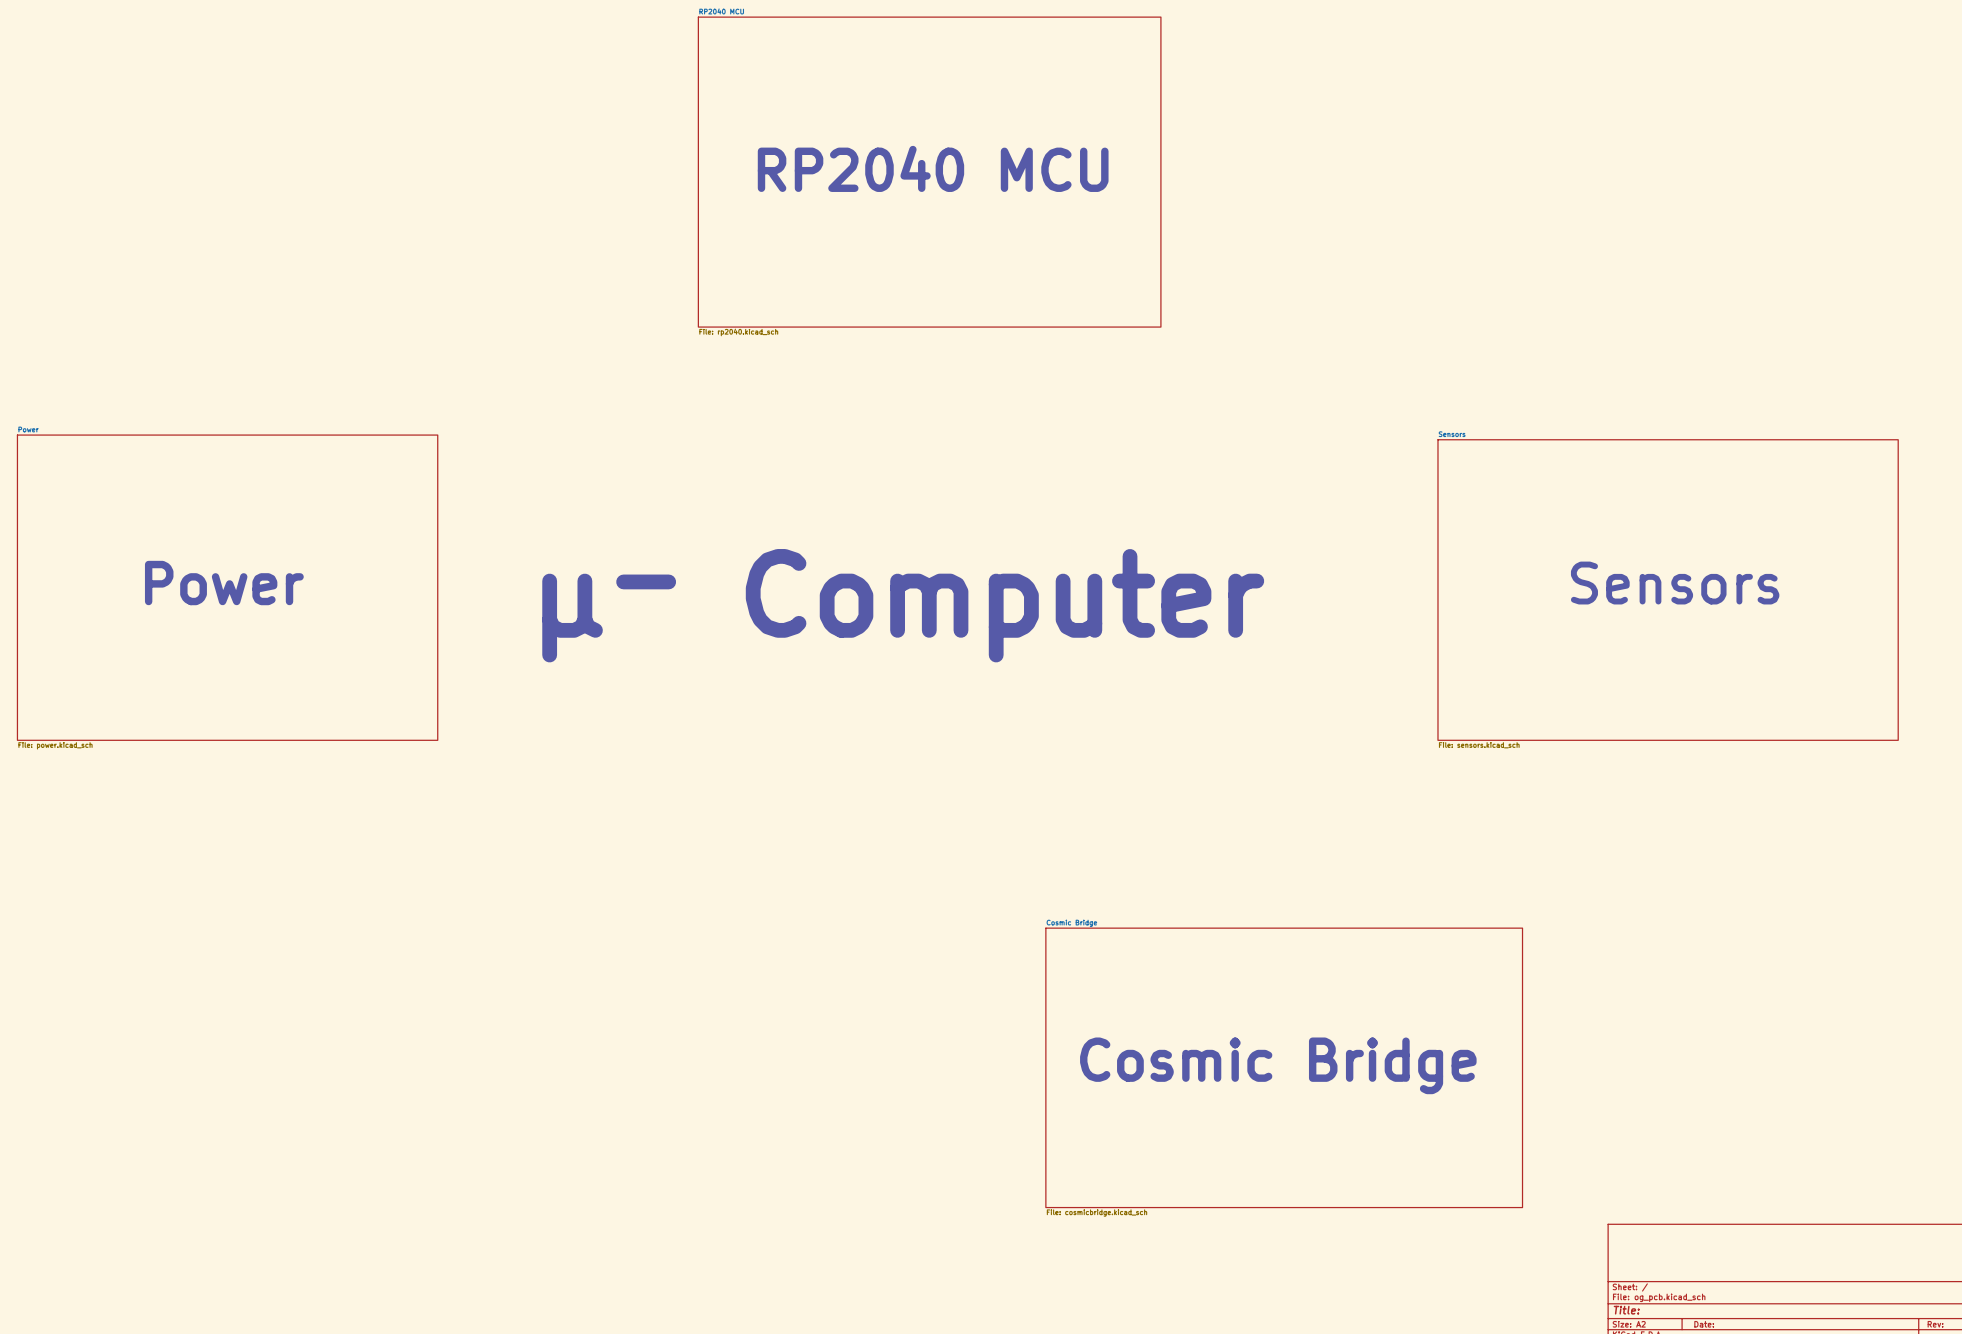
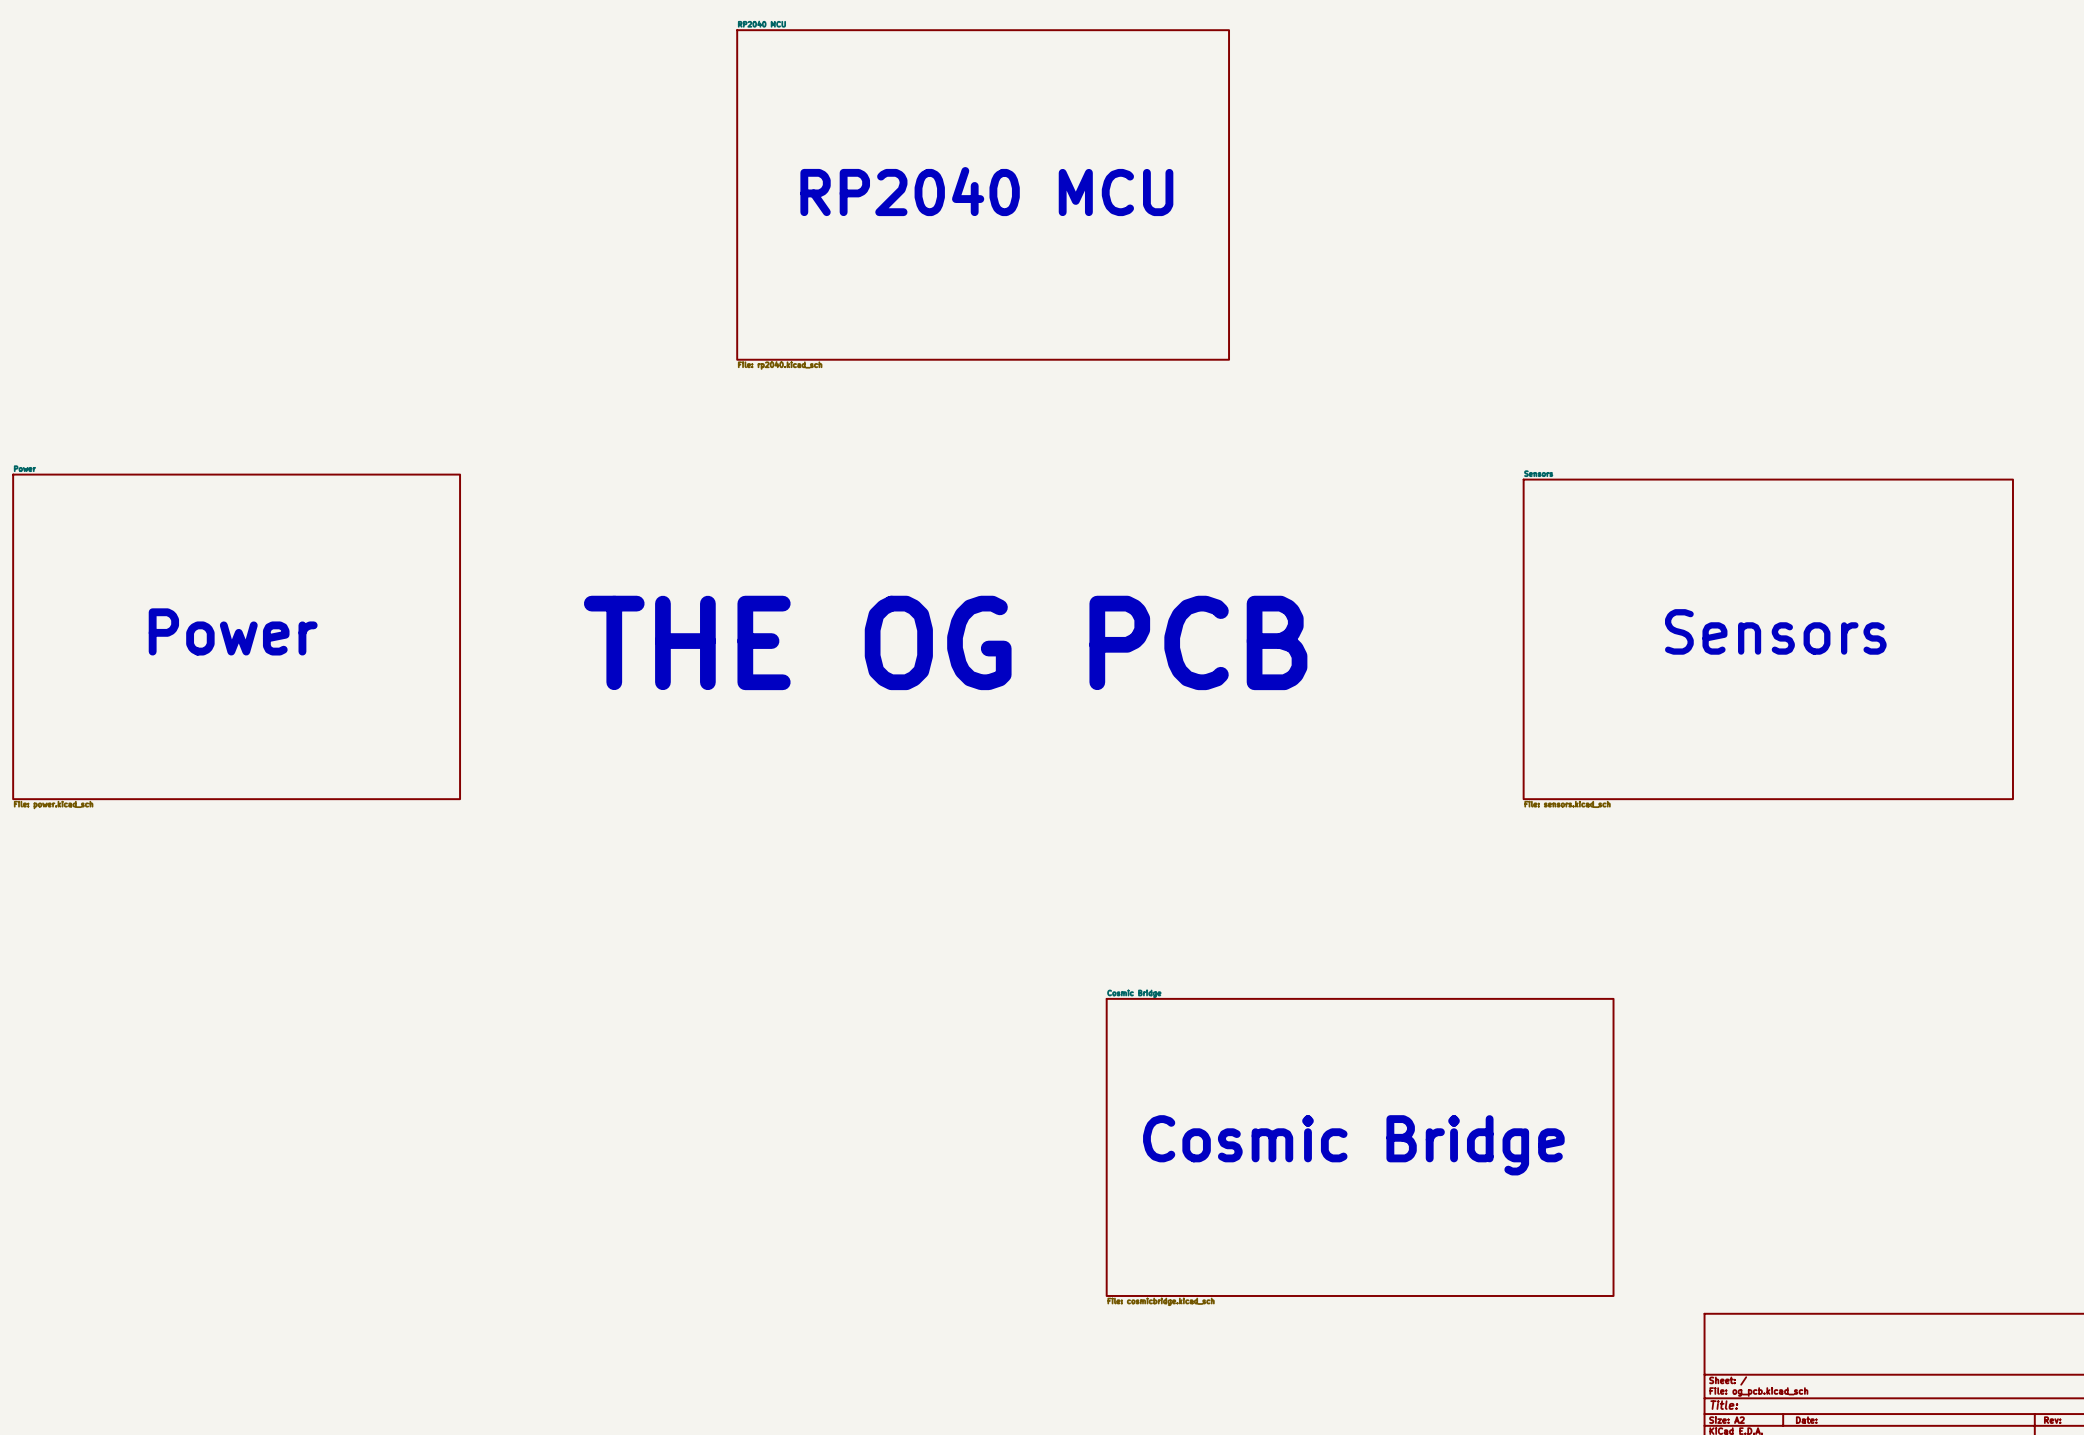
text: μ- Computer (903, 605) -> THE OG PCB (945, 642)

